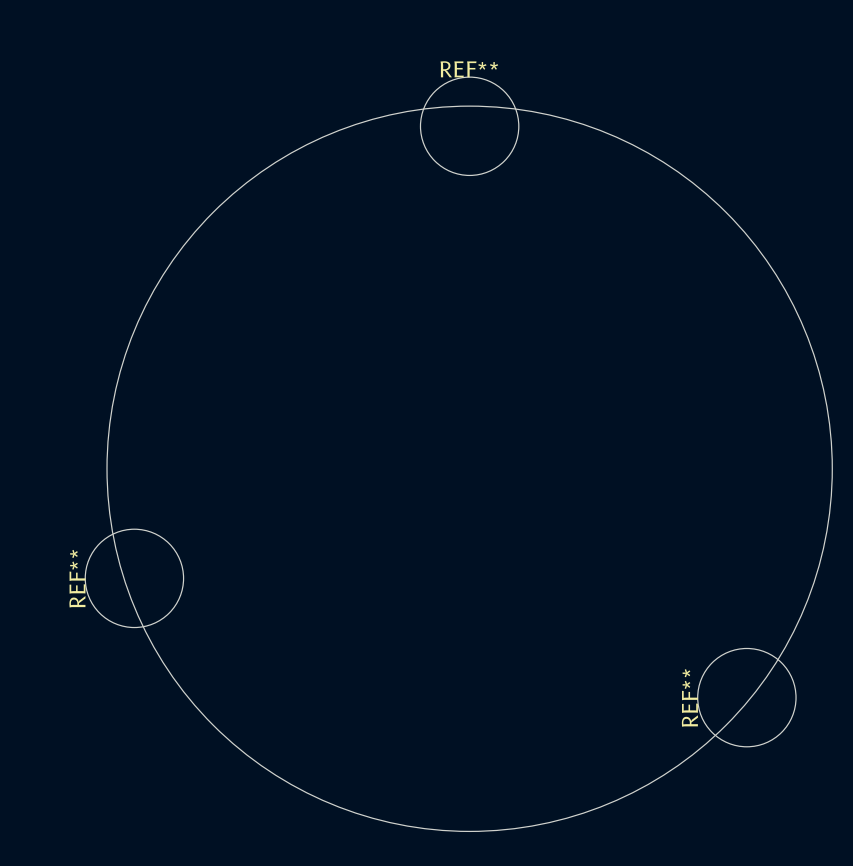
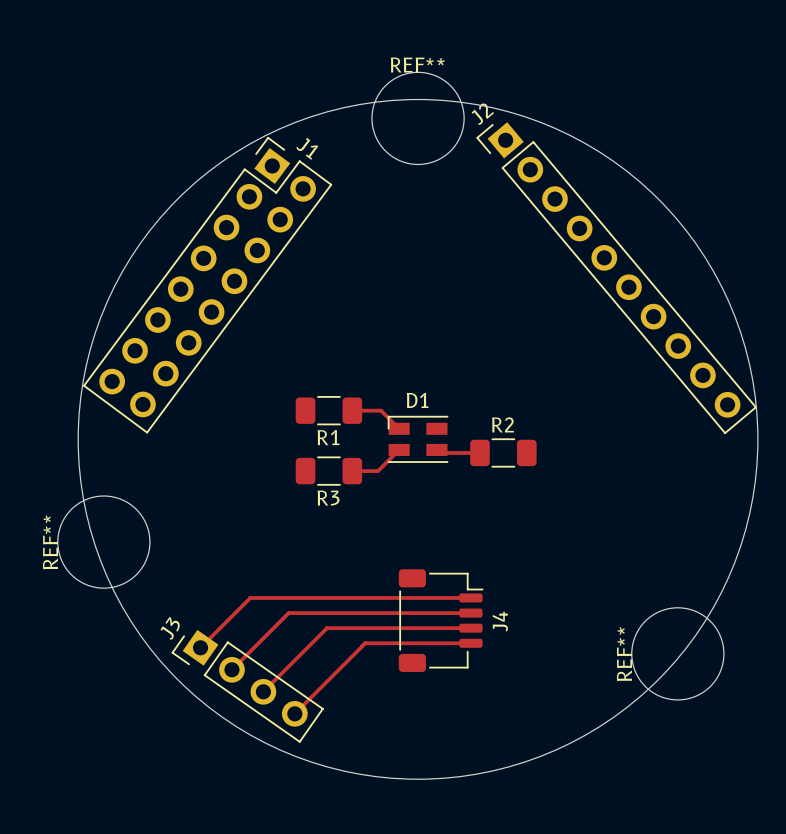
J2: none -> (616, 278)
J1: none -> (207, 285)
R1: none -> (328, 410)
track: none -> (352, 410) (381, 410) (399, 428)
D1: none -> (418, 439)
track: none -> (399, 449) (378, 471) (352, 471)
track: none -> (436, 449) (439, 452) (479, 452)
R2: none -> (503, 452)
R3: none -> (328, 471)
track: none -> (470, 597) (250, 597) (200, 647)
track: none -> (470, 613) (288, 613) (231, 669)
J4: none -> (441, 620)
track: none -> (470, 628) (327, 628) (263, 691)
track: none -> (470, 643) (365, 643) (362, 646)
track: none -> (362, 646) (294, 713)
J3: none -> (247, 686)

